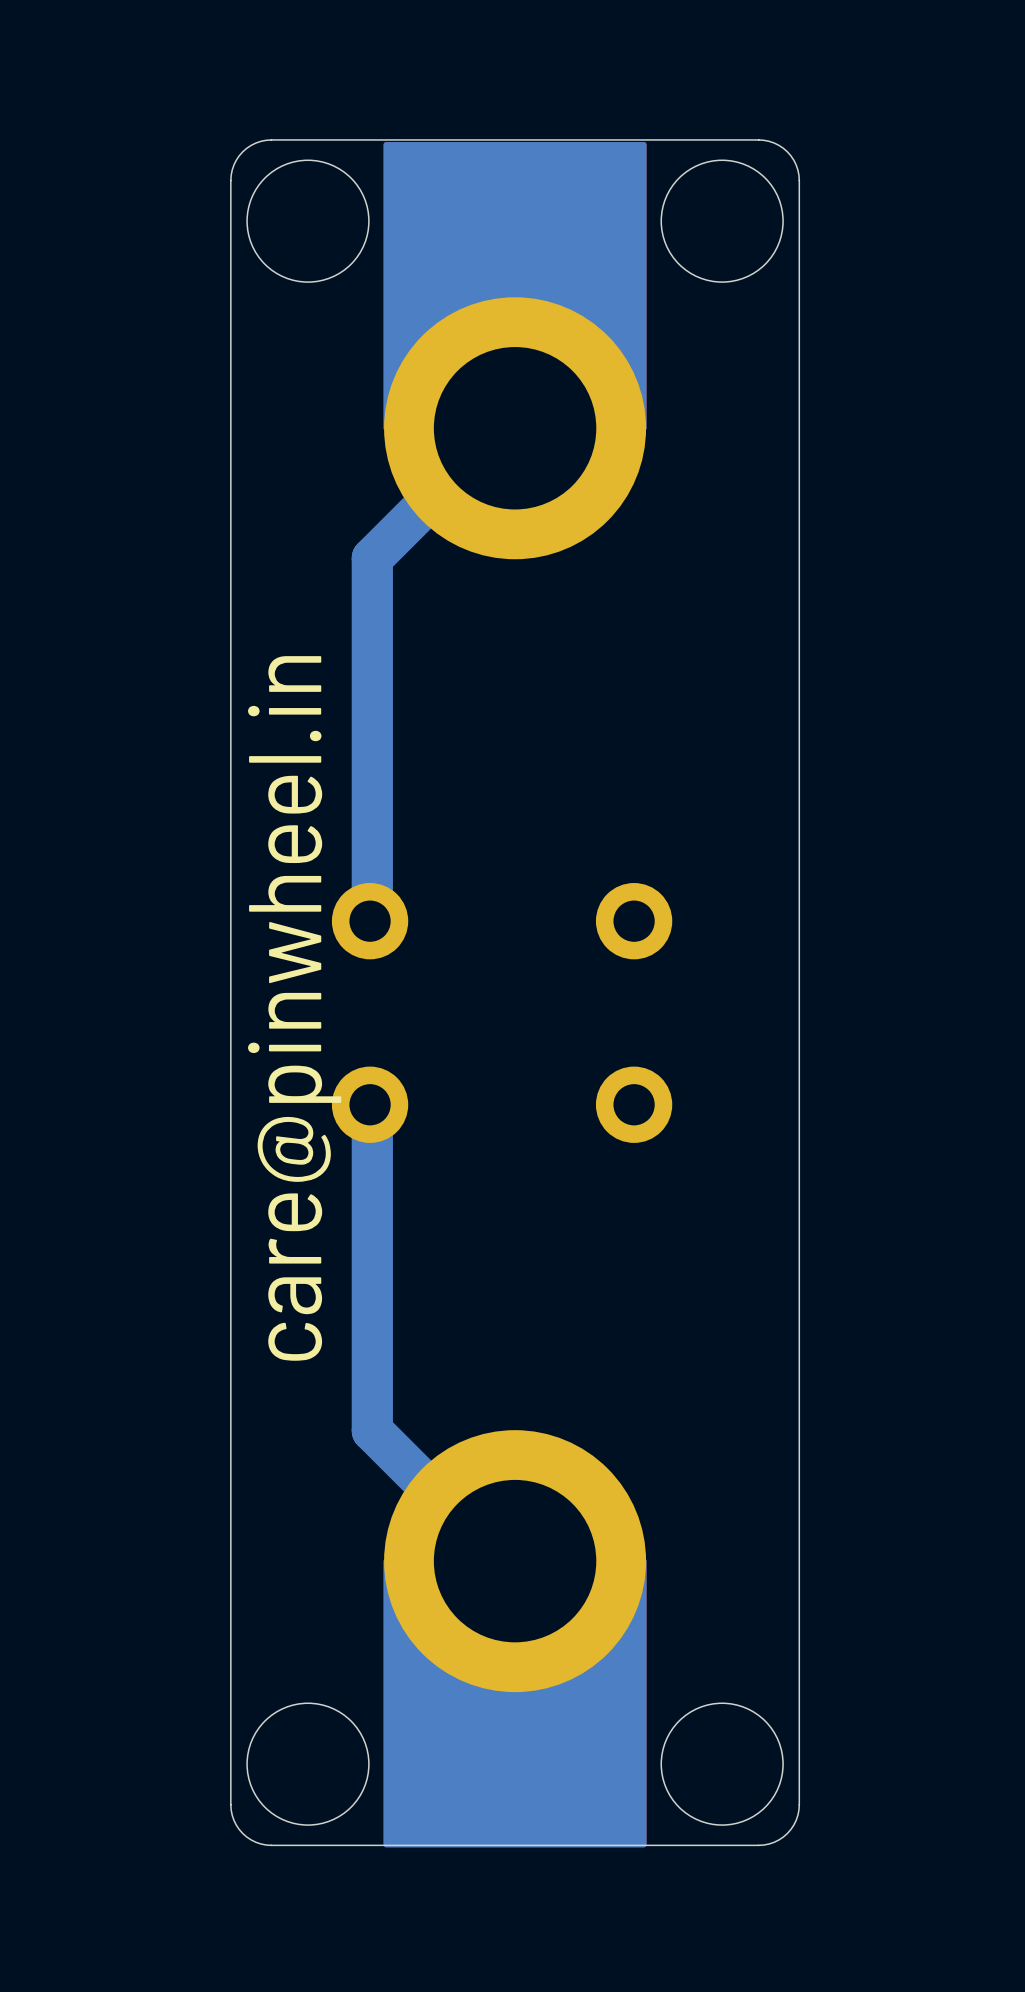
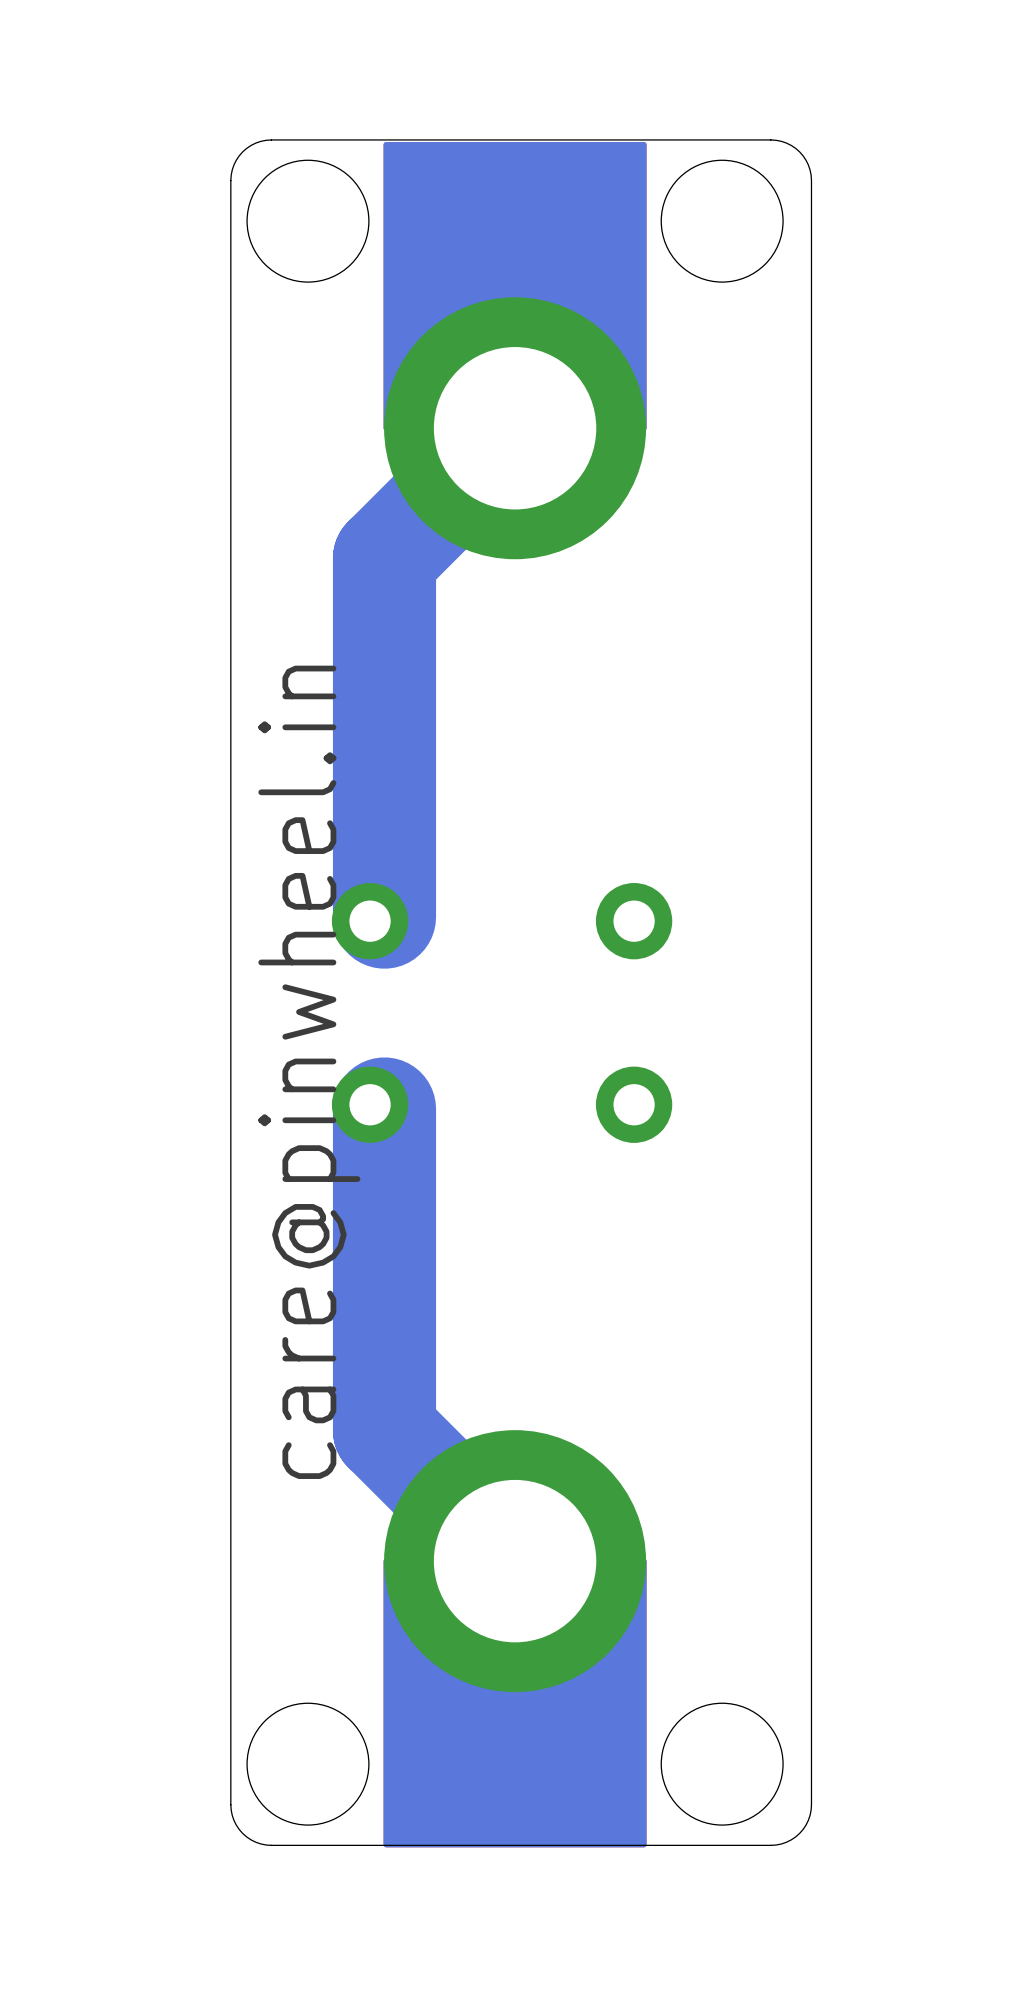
board edge: (758, 139) (774, 143) (787, 151) (796, 165) (799, 180) (799, 1804) (796, 1820) (787, 1833) (774, 1842) (758, 1845) -> (758, 139) (781, 141) (795, 148) (808, 165) (811, 180) (811, 1804) (808, 1820) (795, 1836) (781, 1843) (758, 1845)
bottom track: (515, 428) (502, 428) (372, 558) (372, 917) (370, 921) -> (514, 428) (384, 558) (384, 917) (382, 921)
text position: care@pinwheel.in (294, 1008) -> care@pinwheel.in (309, 1072)
bottom track: (370, 1104) (372, 1108) (372, 1430) (502, 1560) (515, 1561) -> (382, 1104) (384, 1108) (384, 1430) (514, 1560)

